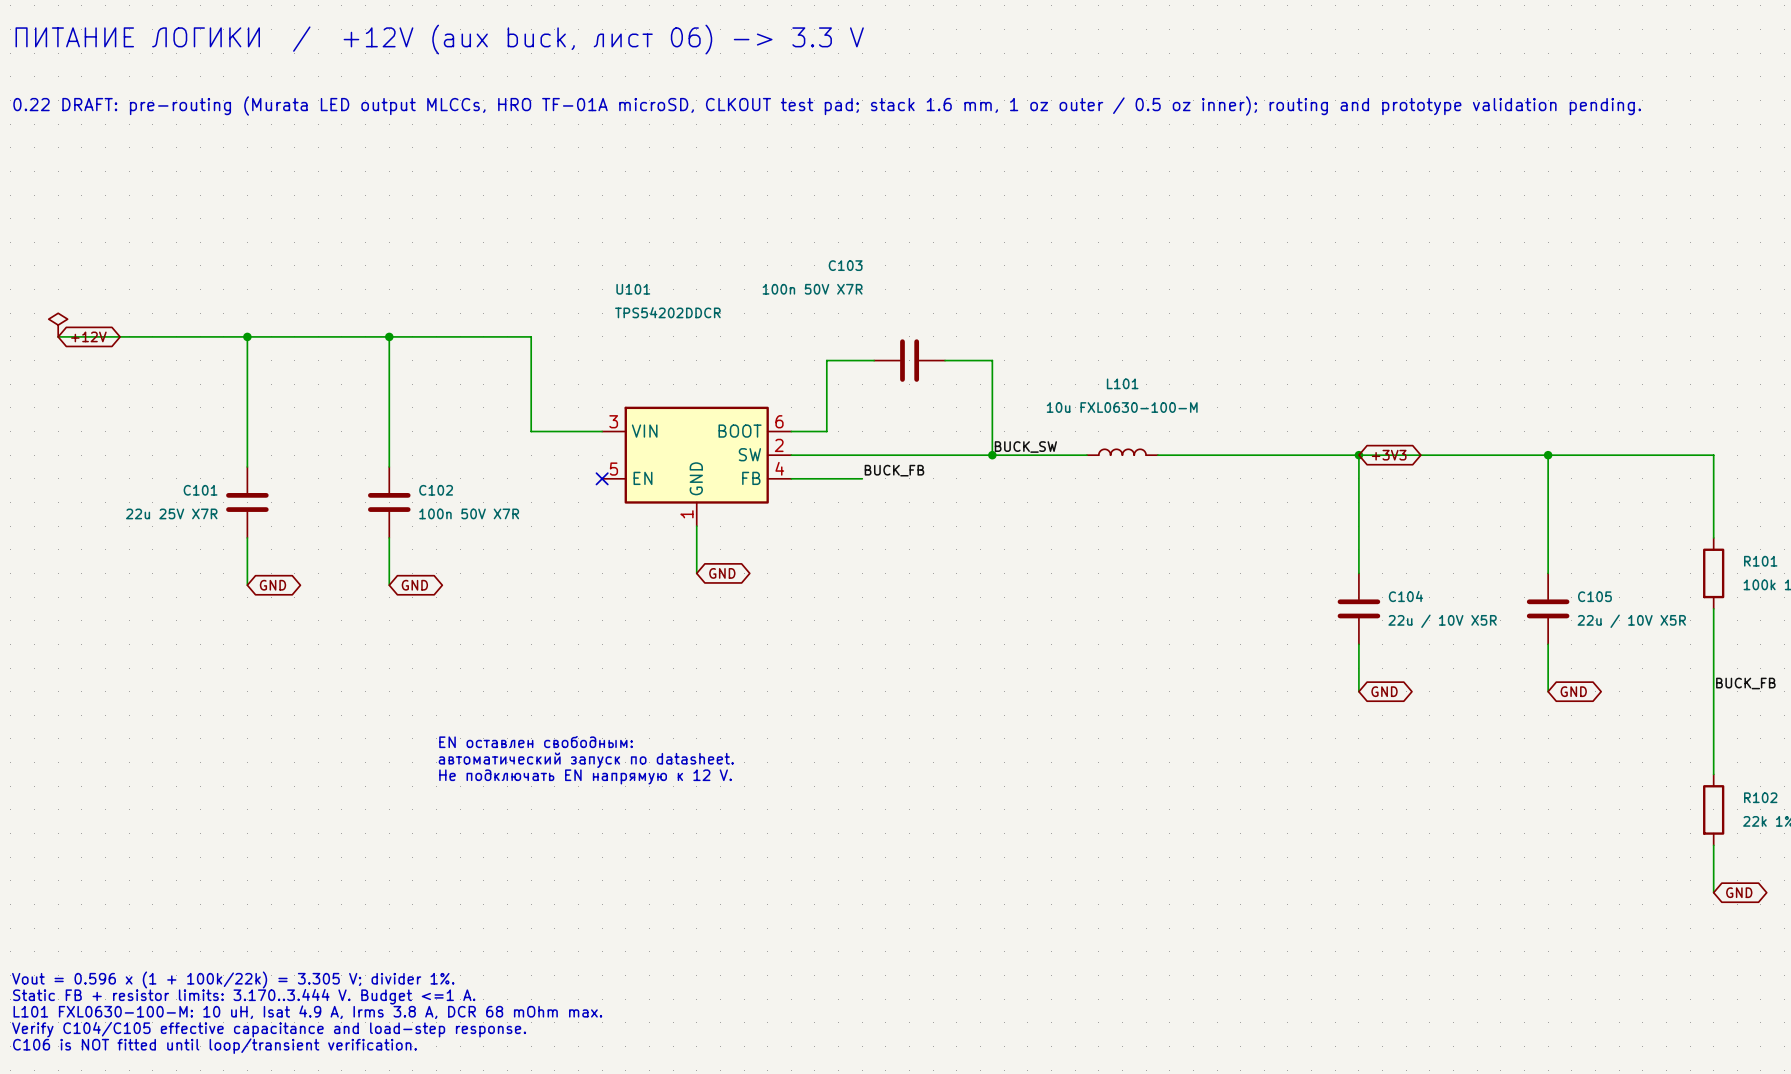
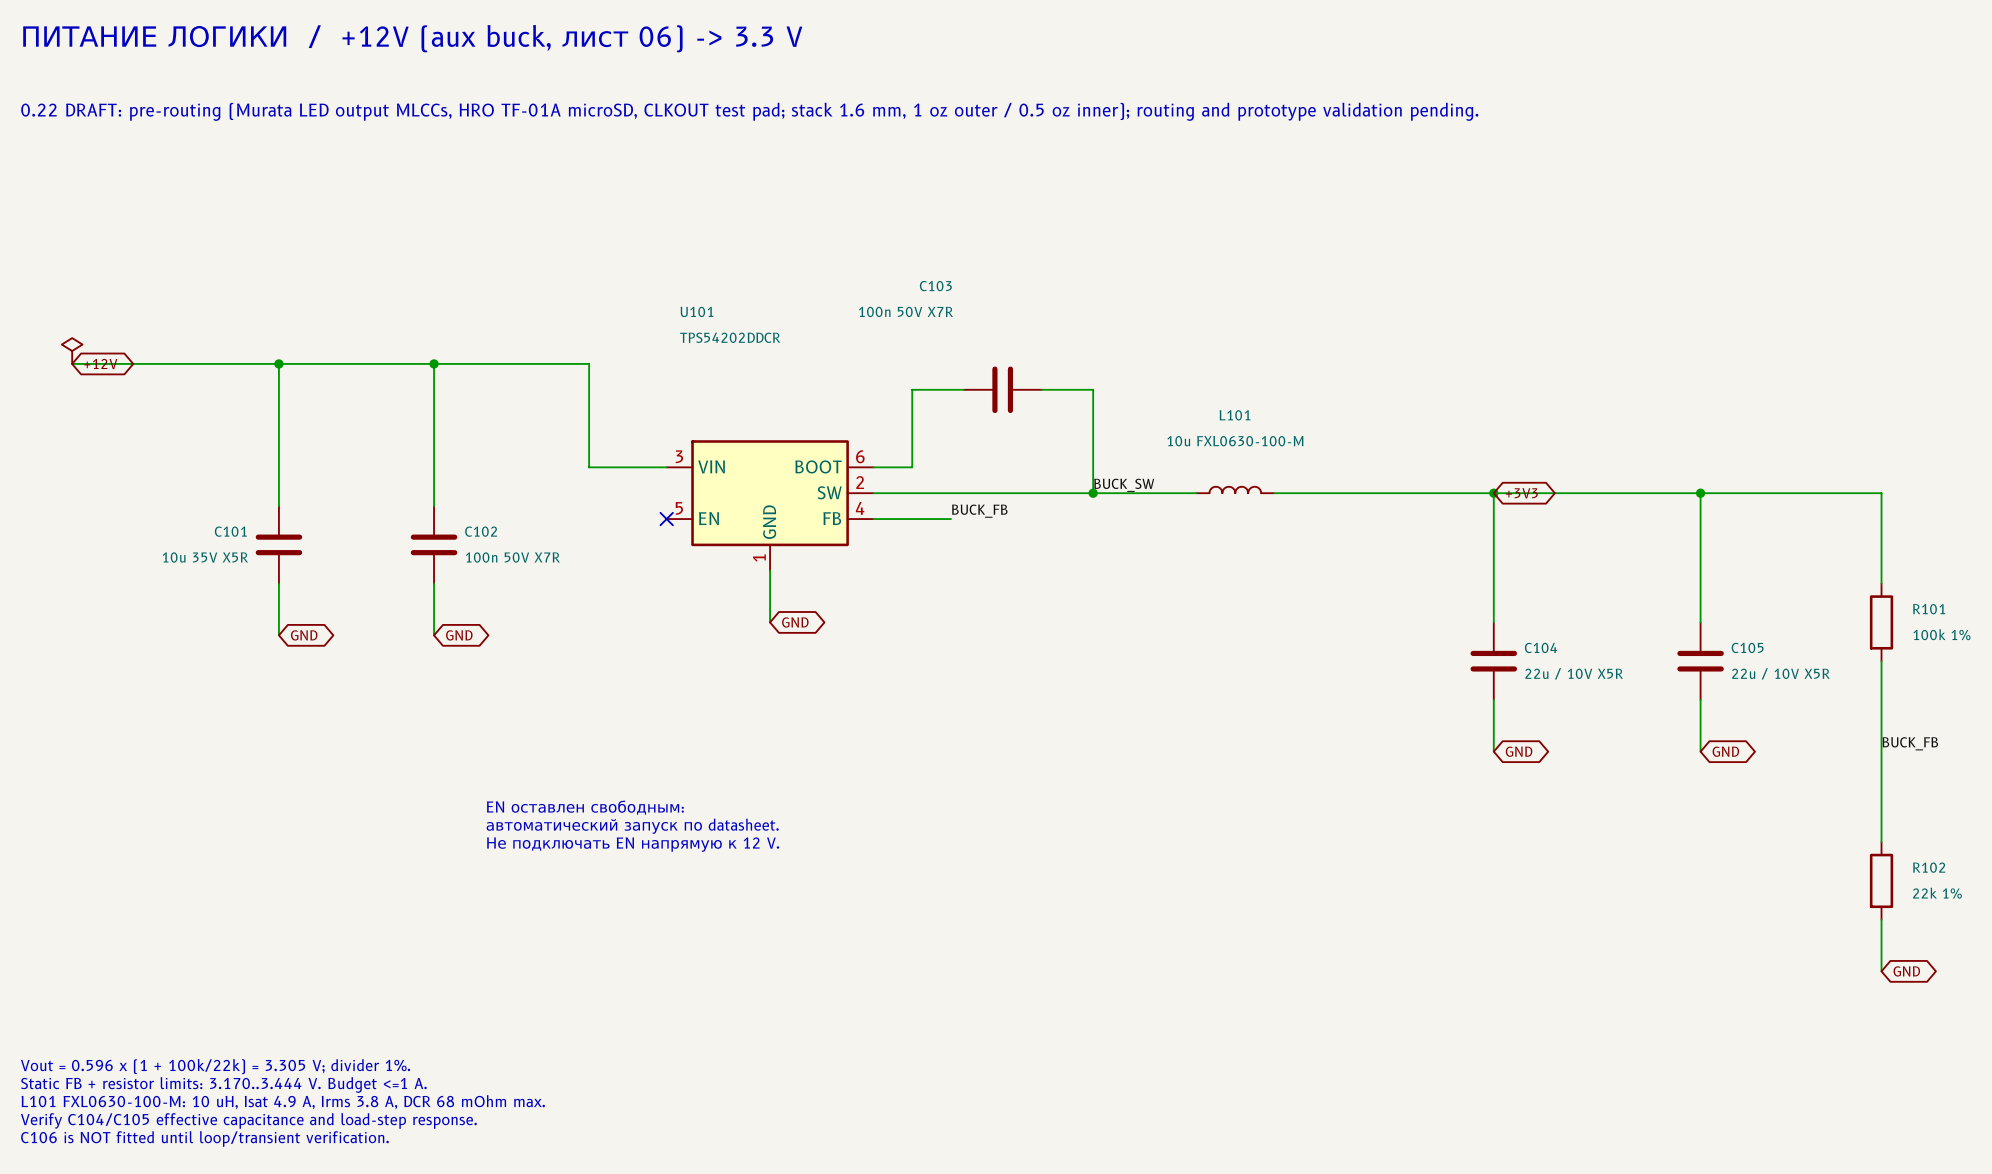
C101 value: 22u 25V X7R (171, 513) -> 10u 35V X5R (205, 557)

